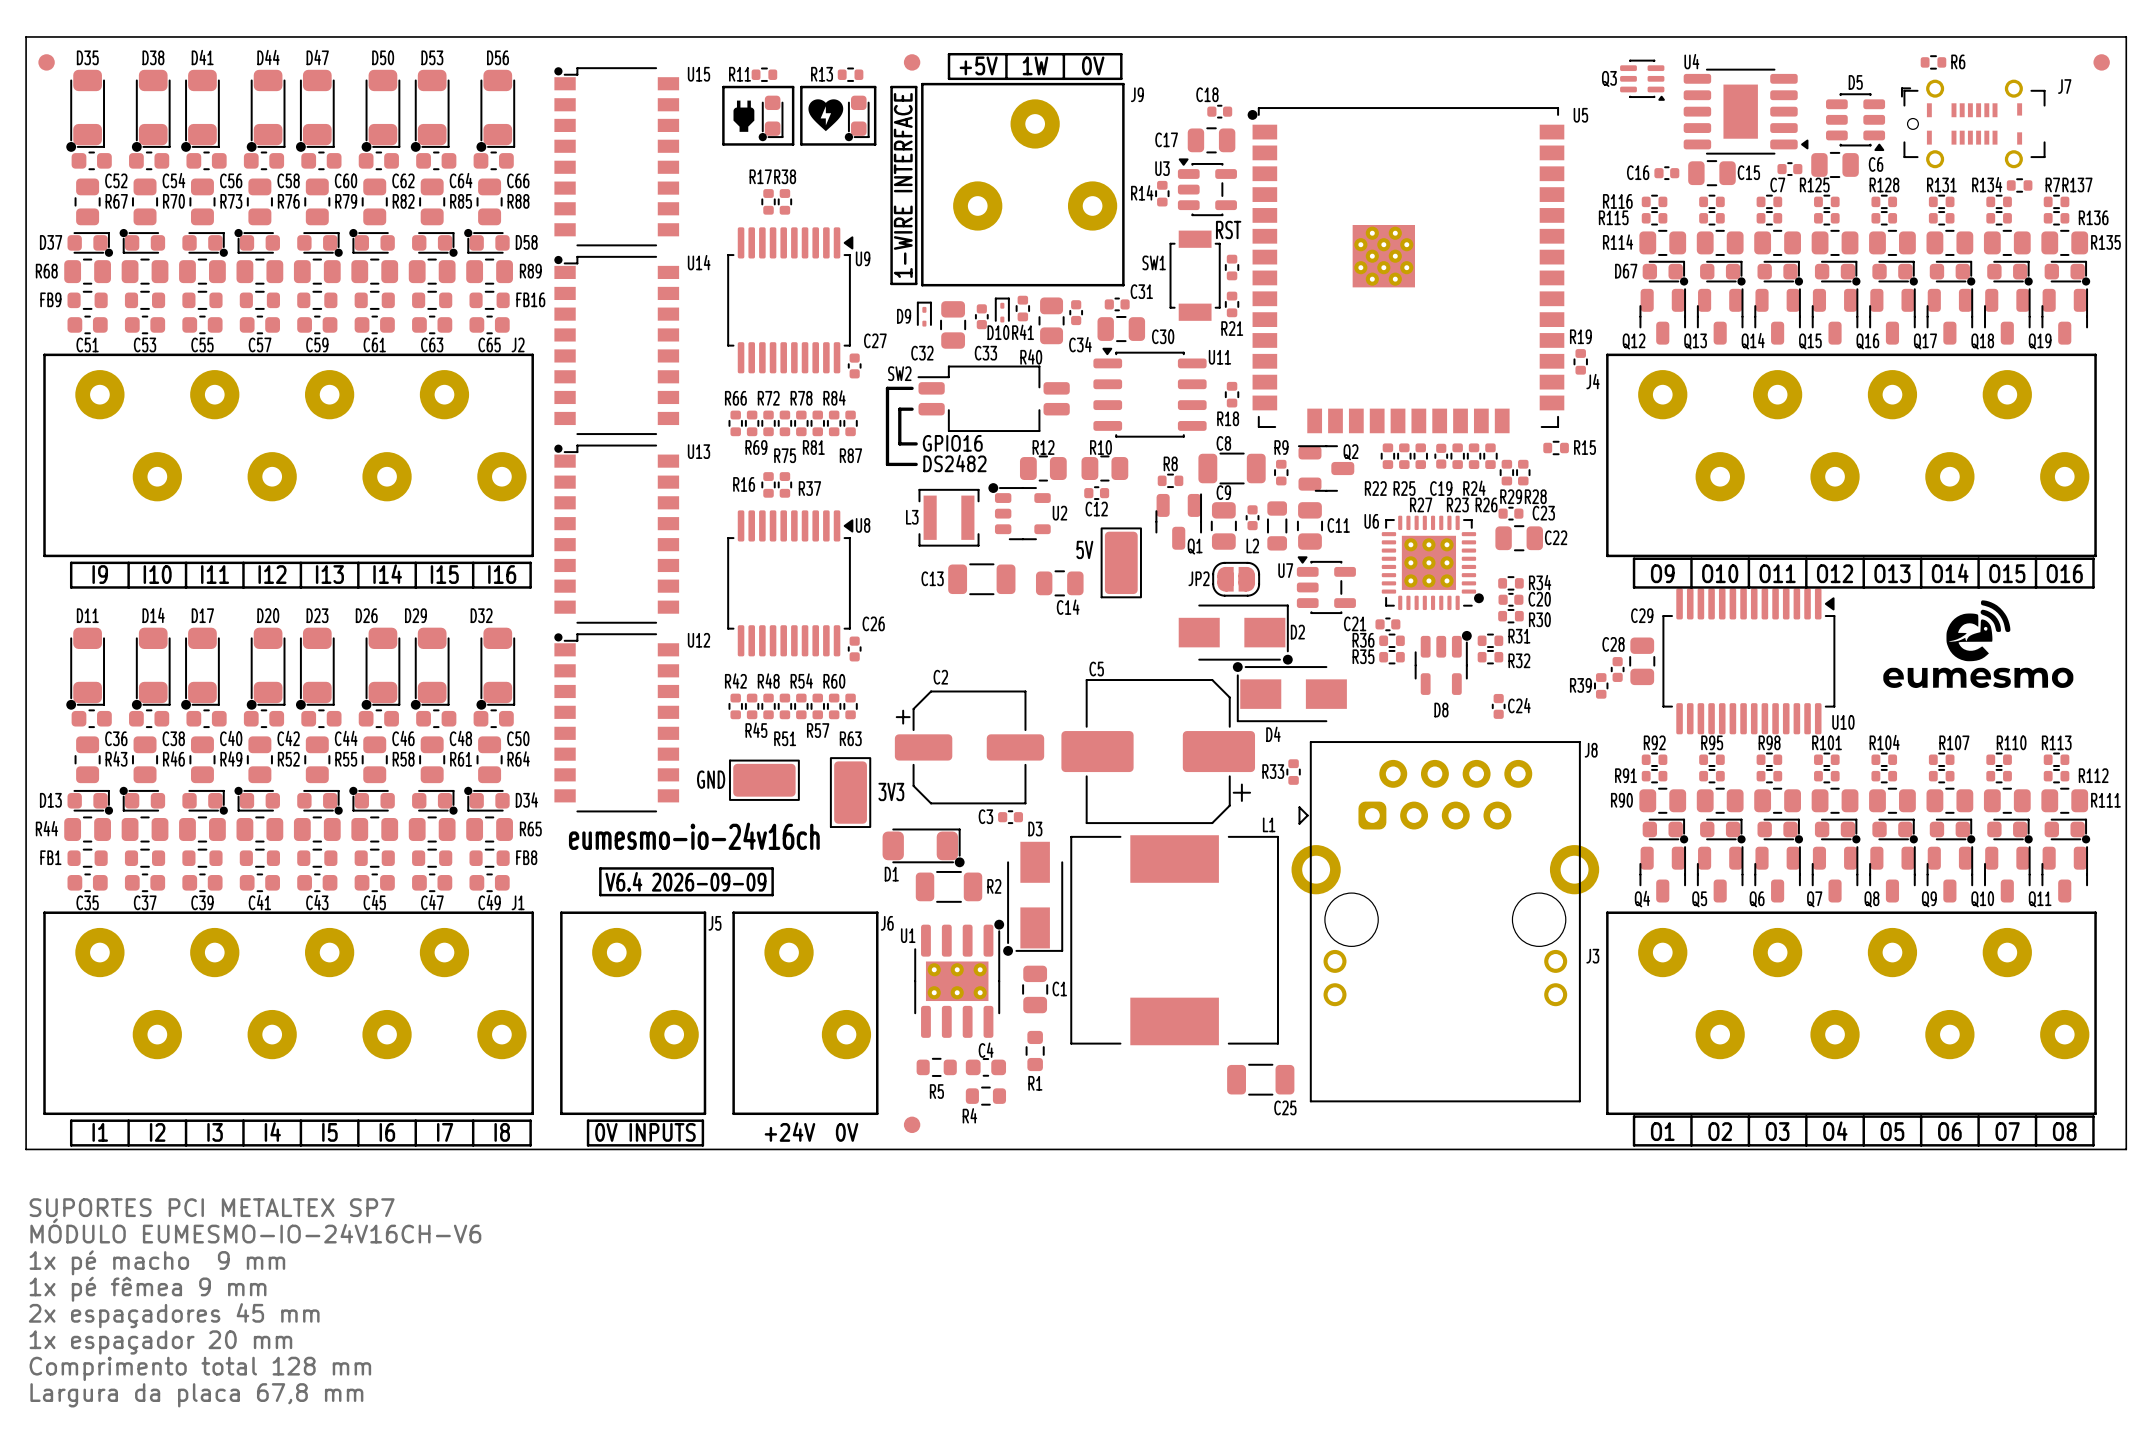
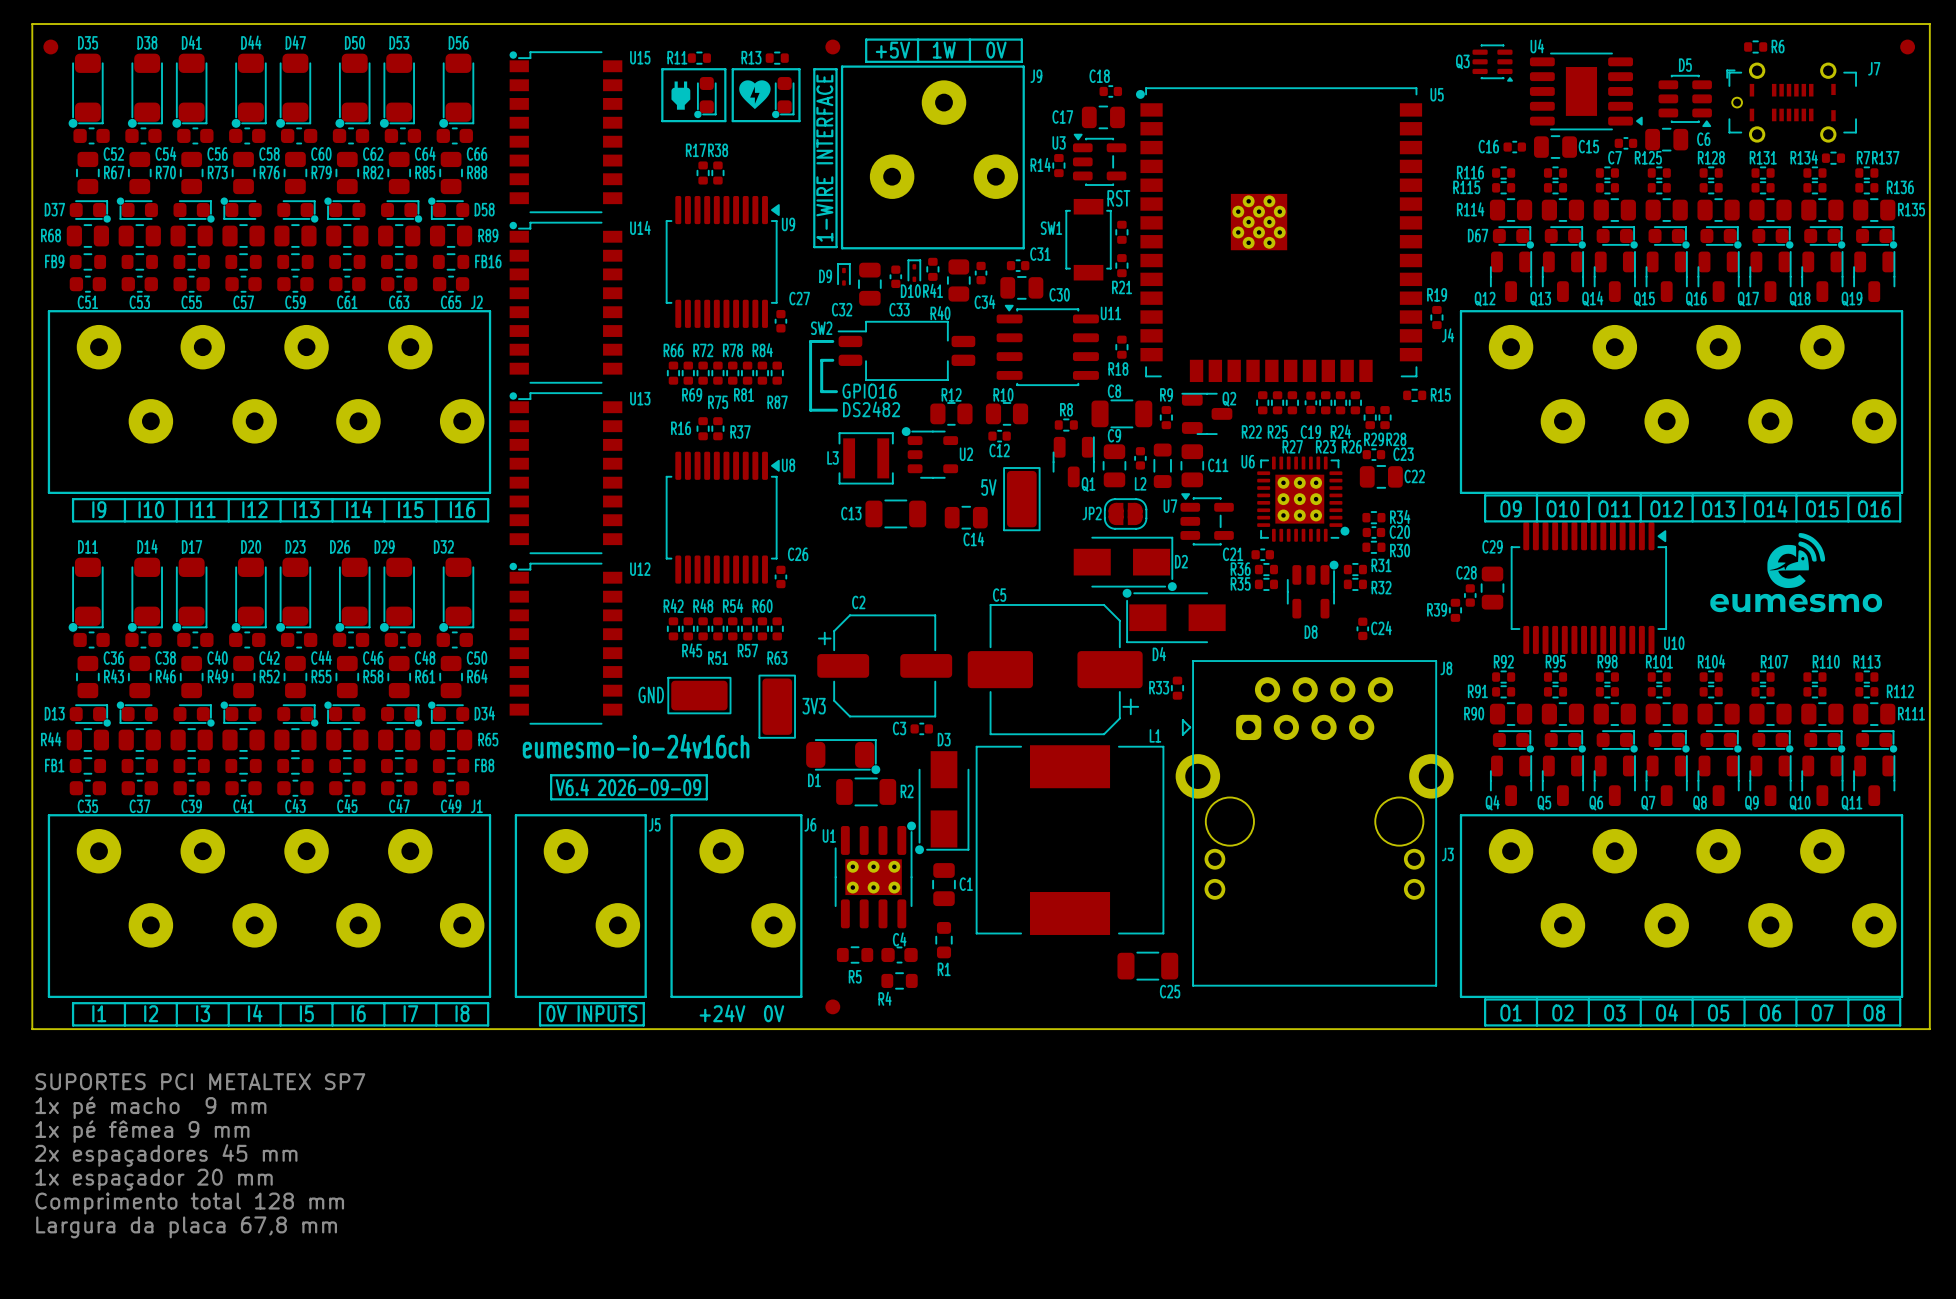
text: MÓDULO EUMESMO-IO-24V16CH-V6 (255, 1230) -> 1x pé macho 9 mm (150, 1107)
text: 1x pé macho 9 mm (157, 1262) -> 1x pé fêmea 9 mm (142, 1131)
text: 1x pé fêmea 9 mm (148, 1289) -> 2x espaçadores 45 mm (166, 1155)
text: 2x espaçadores 45 mm (174, 1315) -> 1x espaçador 20 mm (154, 1179)
text: 1x espaçador 20 mm (160, 1342) -> Comprimento total 128 mm (189, 1203)
text: Comprimento total 128 mm (200, 1368) -> Largura da placa 67,8 mm (186, 1227)
text: Largura da placa 67,8 mm (196, 1395) -> none

